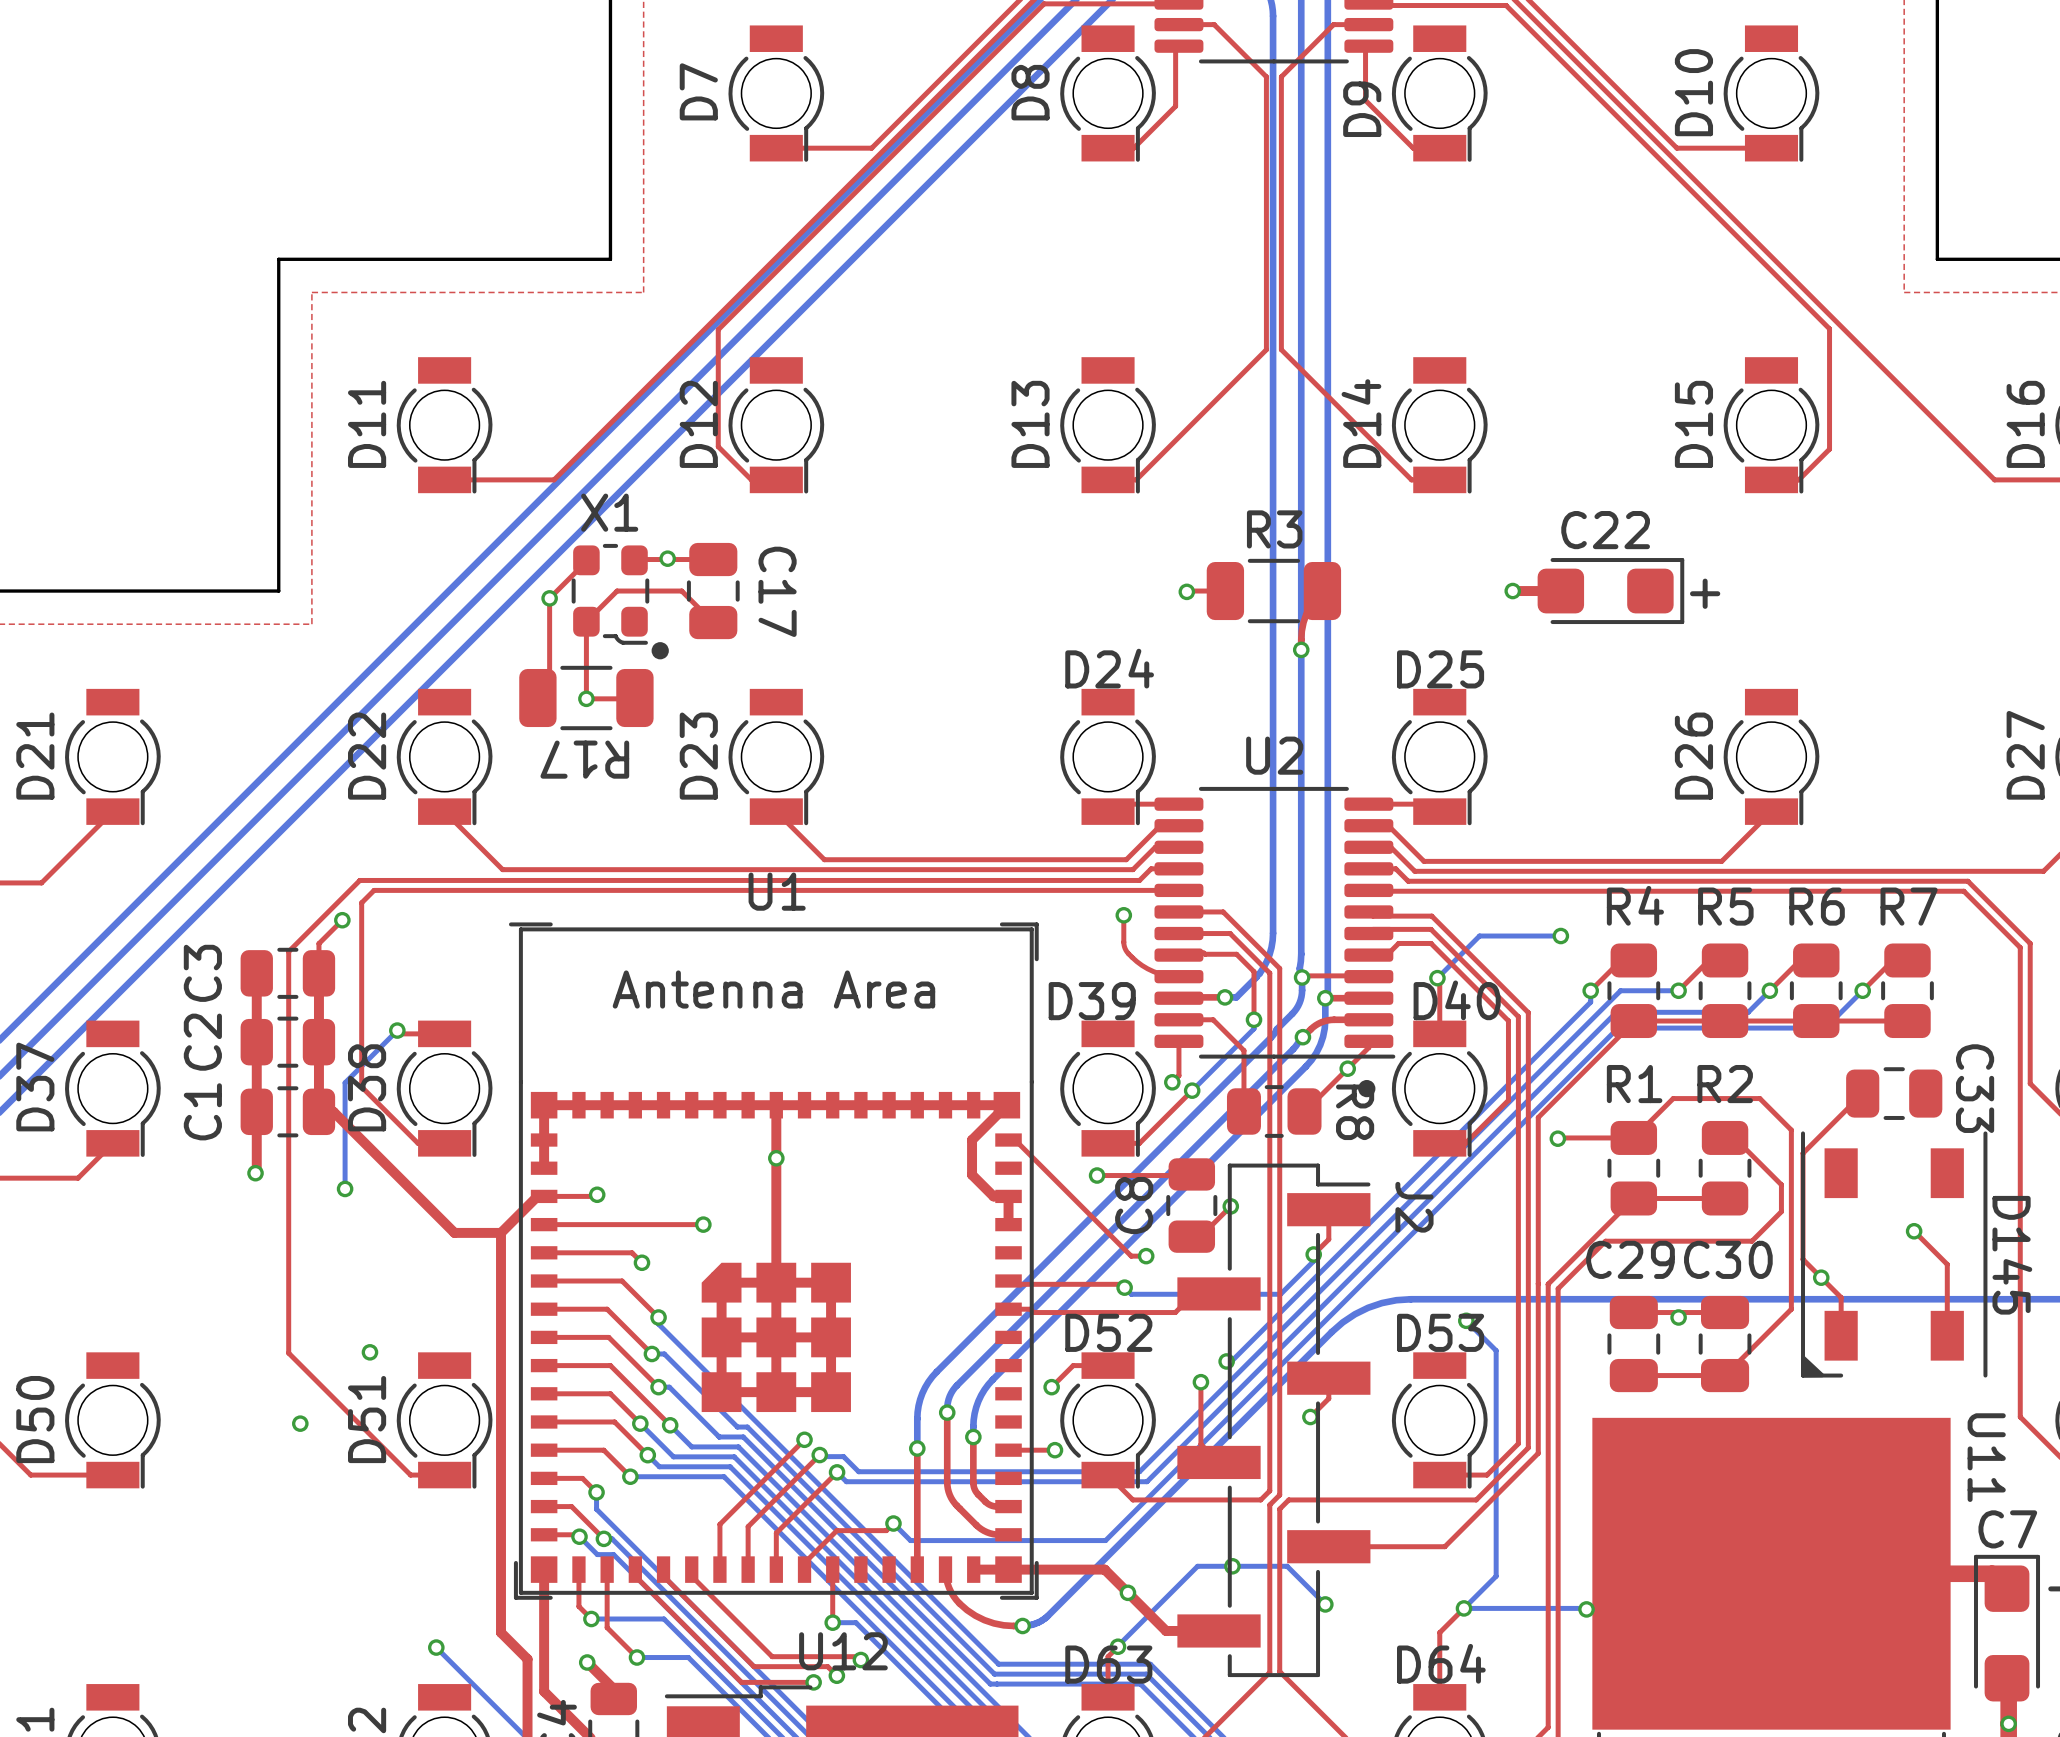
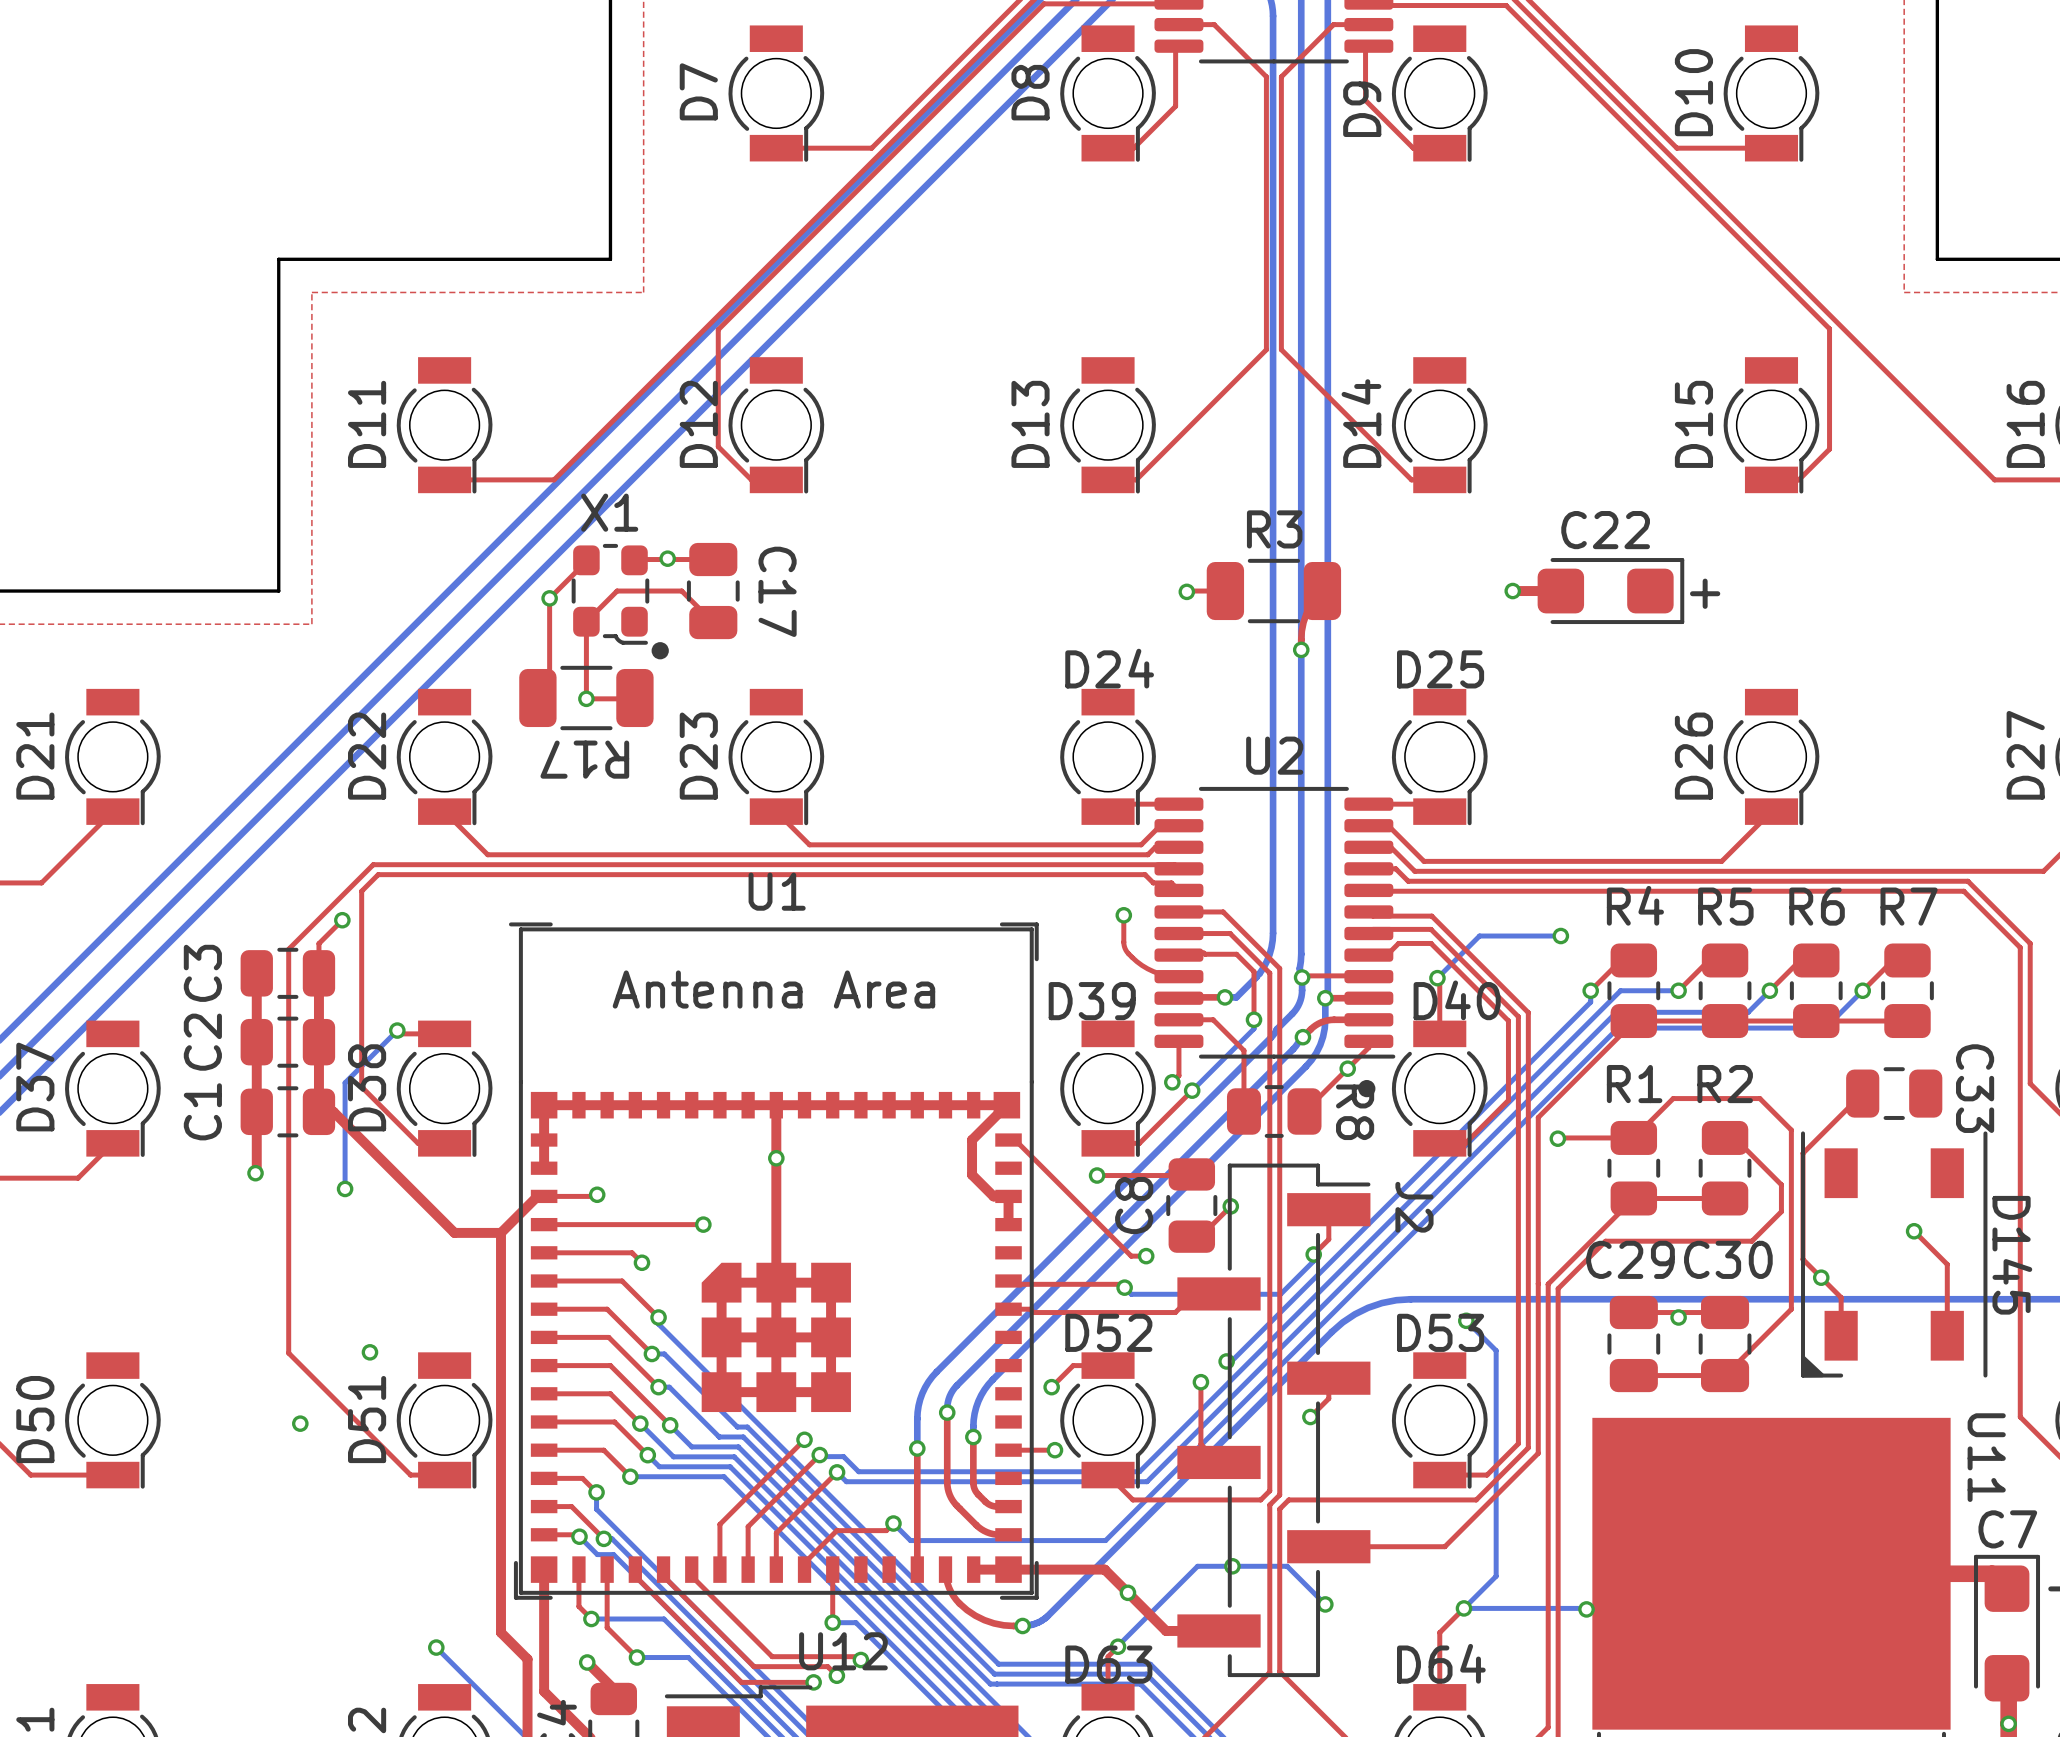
top track: (809, 844) (824, 859) (1126, 859) (1141, 844) -> (809, 844) (1141, 844)
top track: (487, 854) (502, 869) (1132, 869) (1147, 854) -> (487, 854) (1147, 854)
top track: (1178, 868) (1151, 868) (1139, 880) (359, 880) (288, 951) -> (1178, 868) (1174, 864) (373, 864) (288, 949) (288, 951)
top track: (1178, 890) (374, 890) (361, 902) -> (1178, 890) (1171, 882) (1153, 882) (1145, 874) (378, 874) (361, 891) (361, 902)

